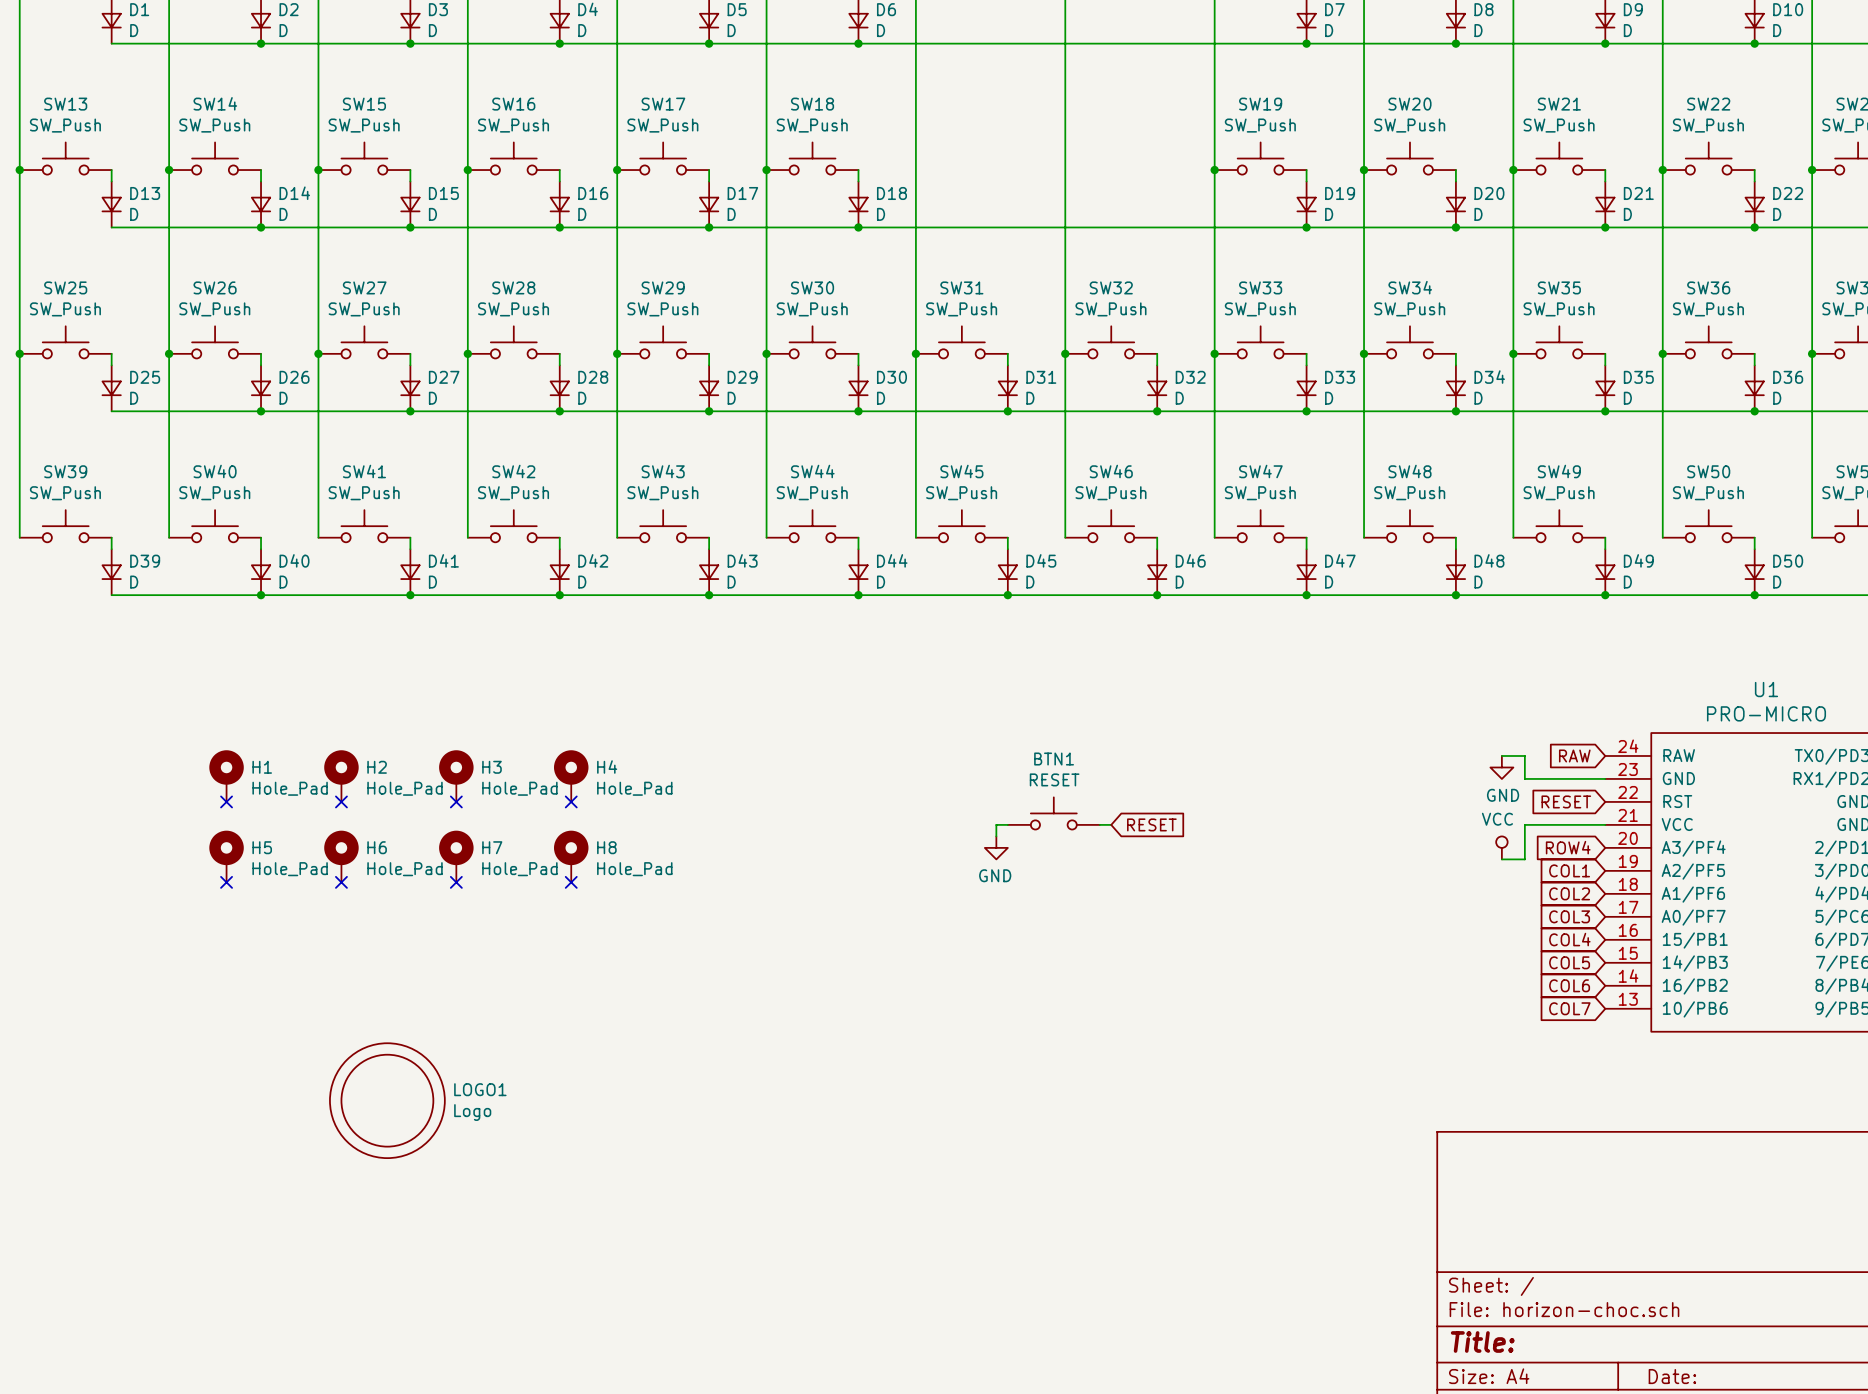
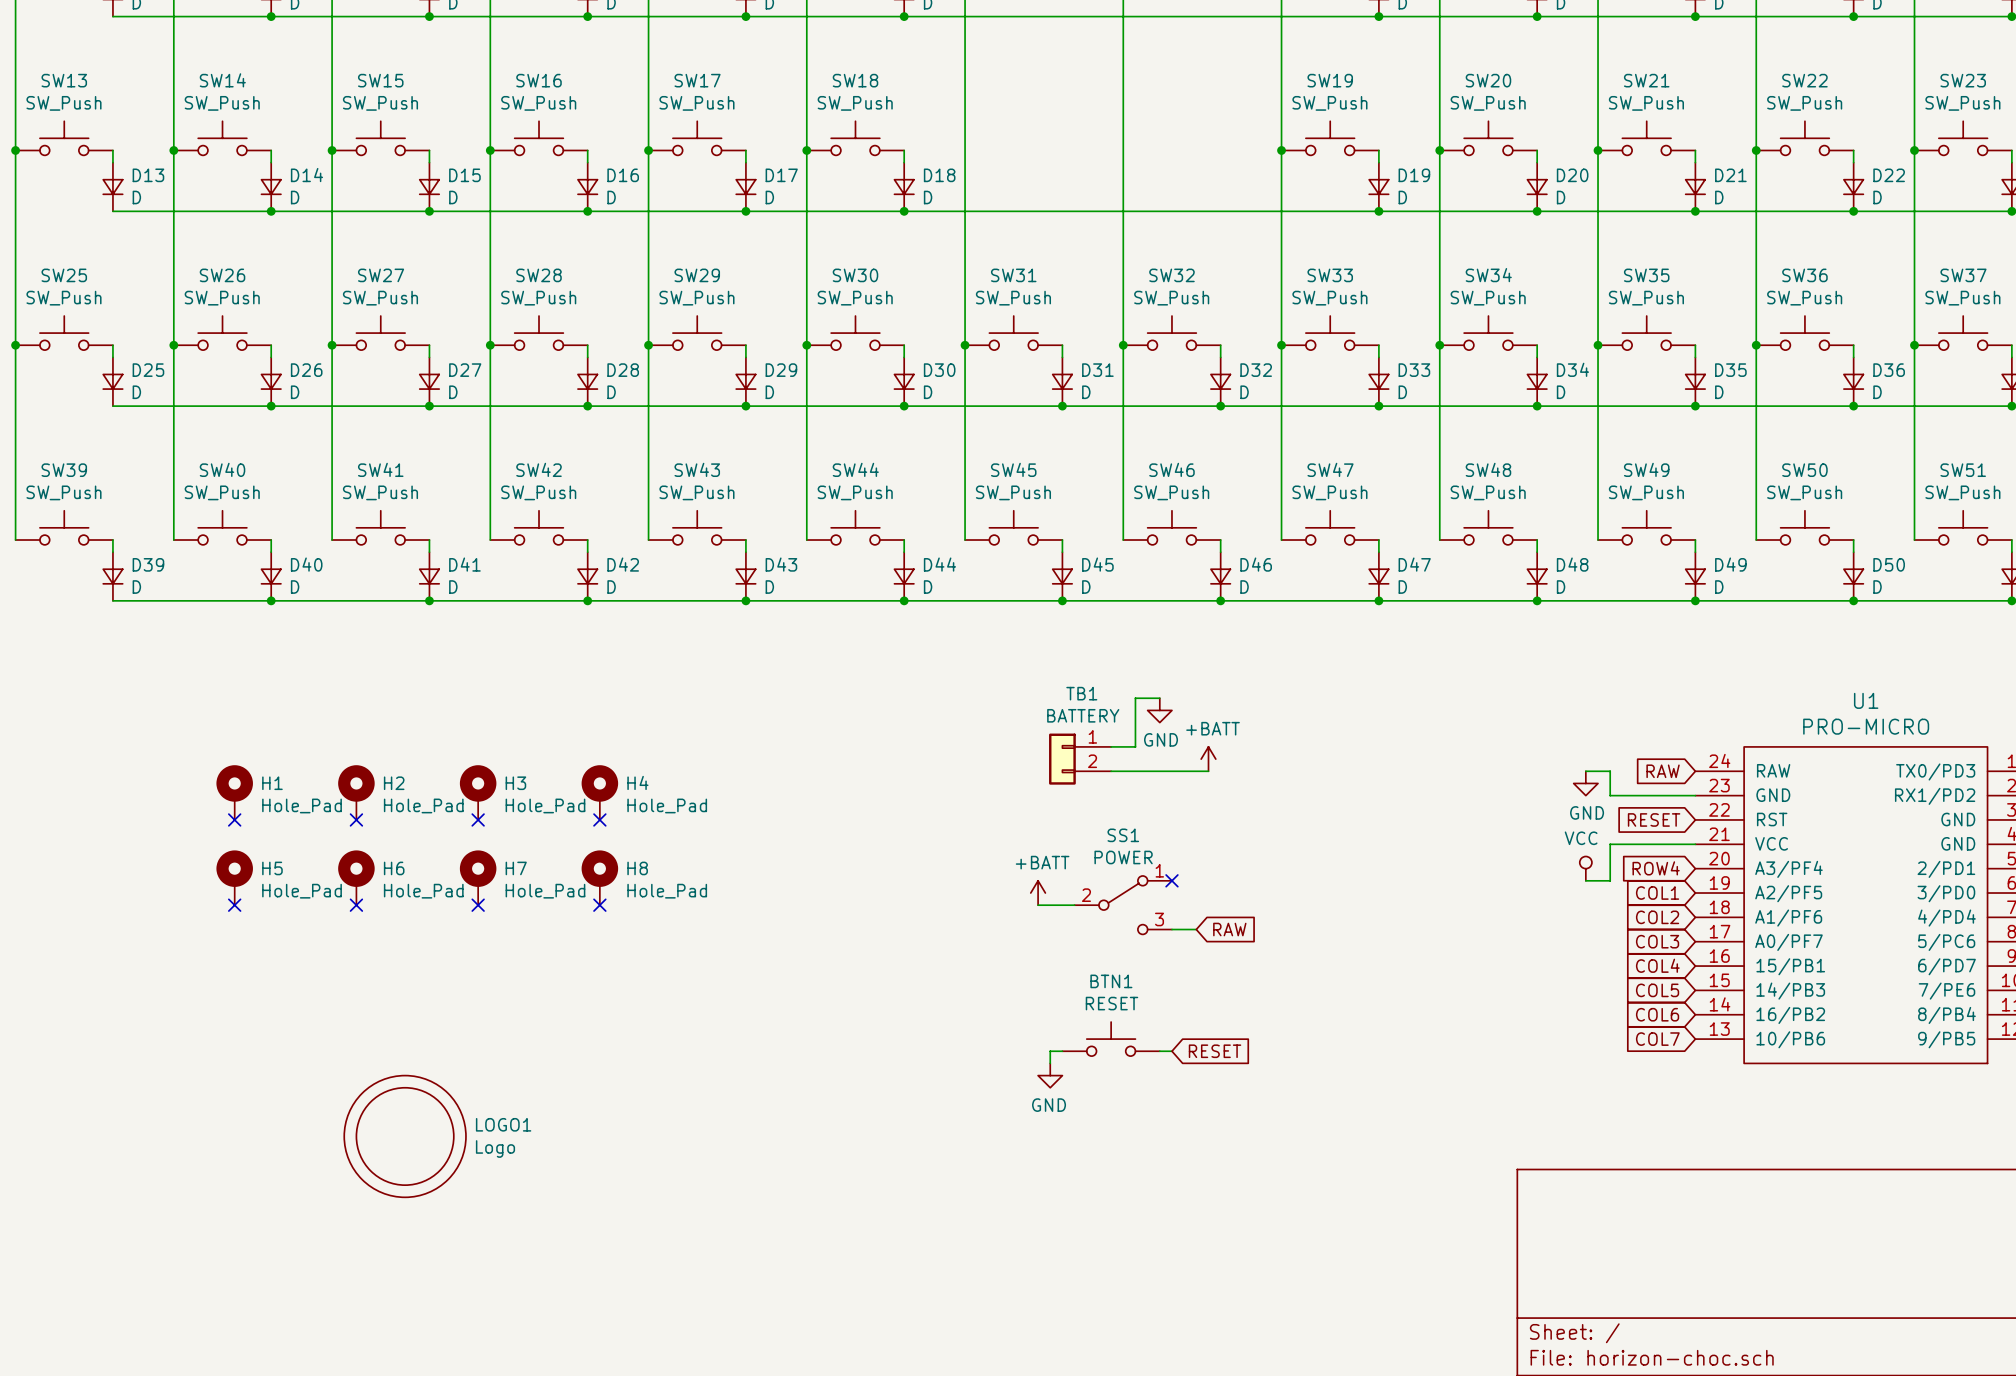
wire: none -> (1159, 698) (1135, 698) (1135, 746) (1111, 746)
power symbol: none -> GND (1159, 710)
TB1: none -> BATTERY (1080, 759)
power symbol: none -> +BATT (1208, 759)
wire: none -> (1111, 771) (1208, 771)
BTN1 position: (1053, 813) -> (1111, 1039)
wire: (1007, 824) (996, 824) (996, 836) -> (1062, 1051) (1050, 1051) (1050, 1063)
wire: (1099, 824) (1111, 824) -> (1159, 1051) (1171, 1051)
global label position: RESET (1151, 824) -> RESET (1215, 1051)
power symbol: GND (996, 847) -> none
no-connect mark: none -> (1171, 880)
power symbol: none -> +BATT (1038, 893)
wire: none -> (1038, 905) (1074, 905)
SS1: none -> POWER (1123, 905)
wire: none -> (1171, 929) (1196, 929)
global label: none -> RAW (1229, 929)
power symbol: none -> GND (1050, 1075)

